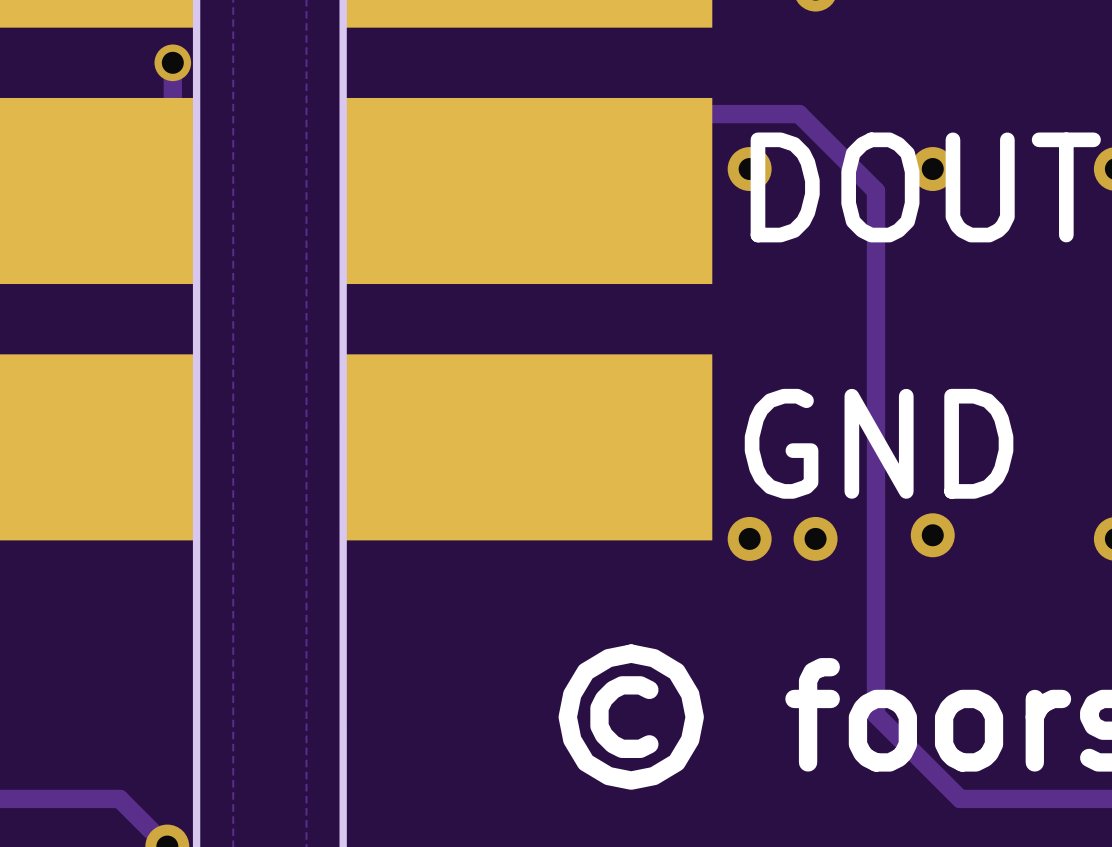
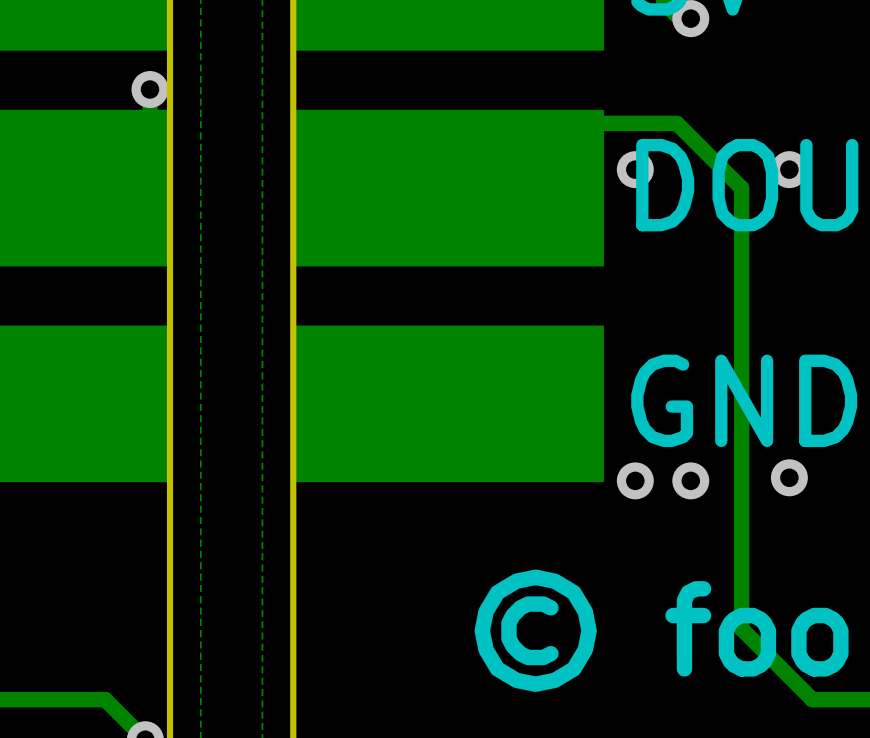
via size: [154, 44, 192, 82] -> [131, 71, 169, 109]

